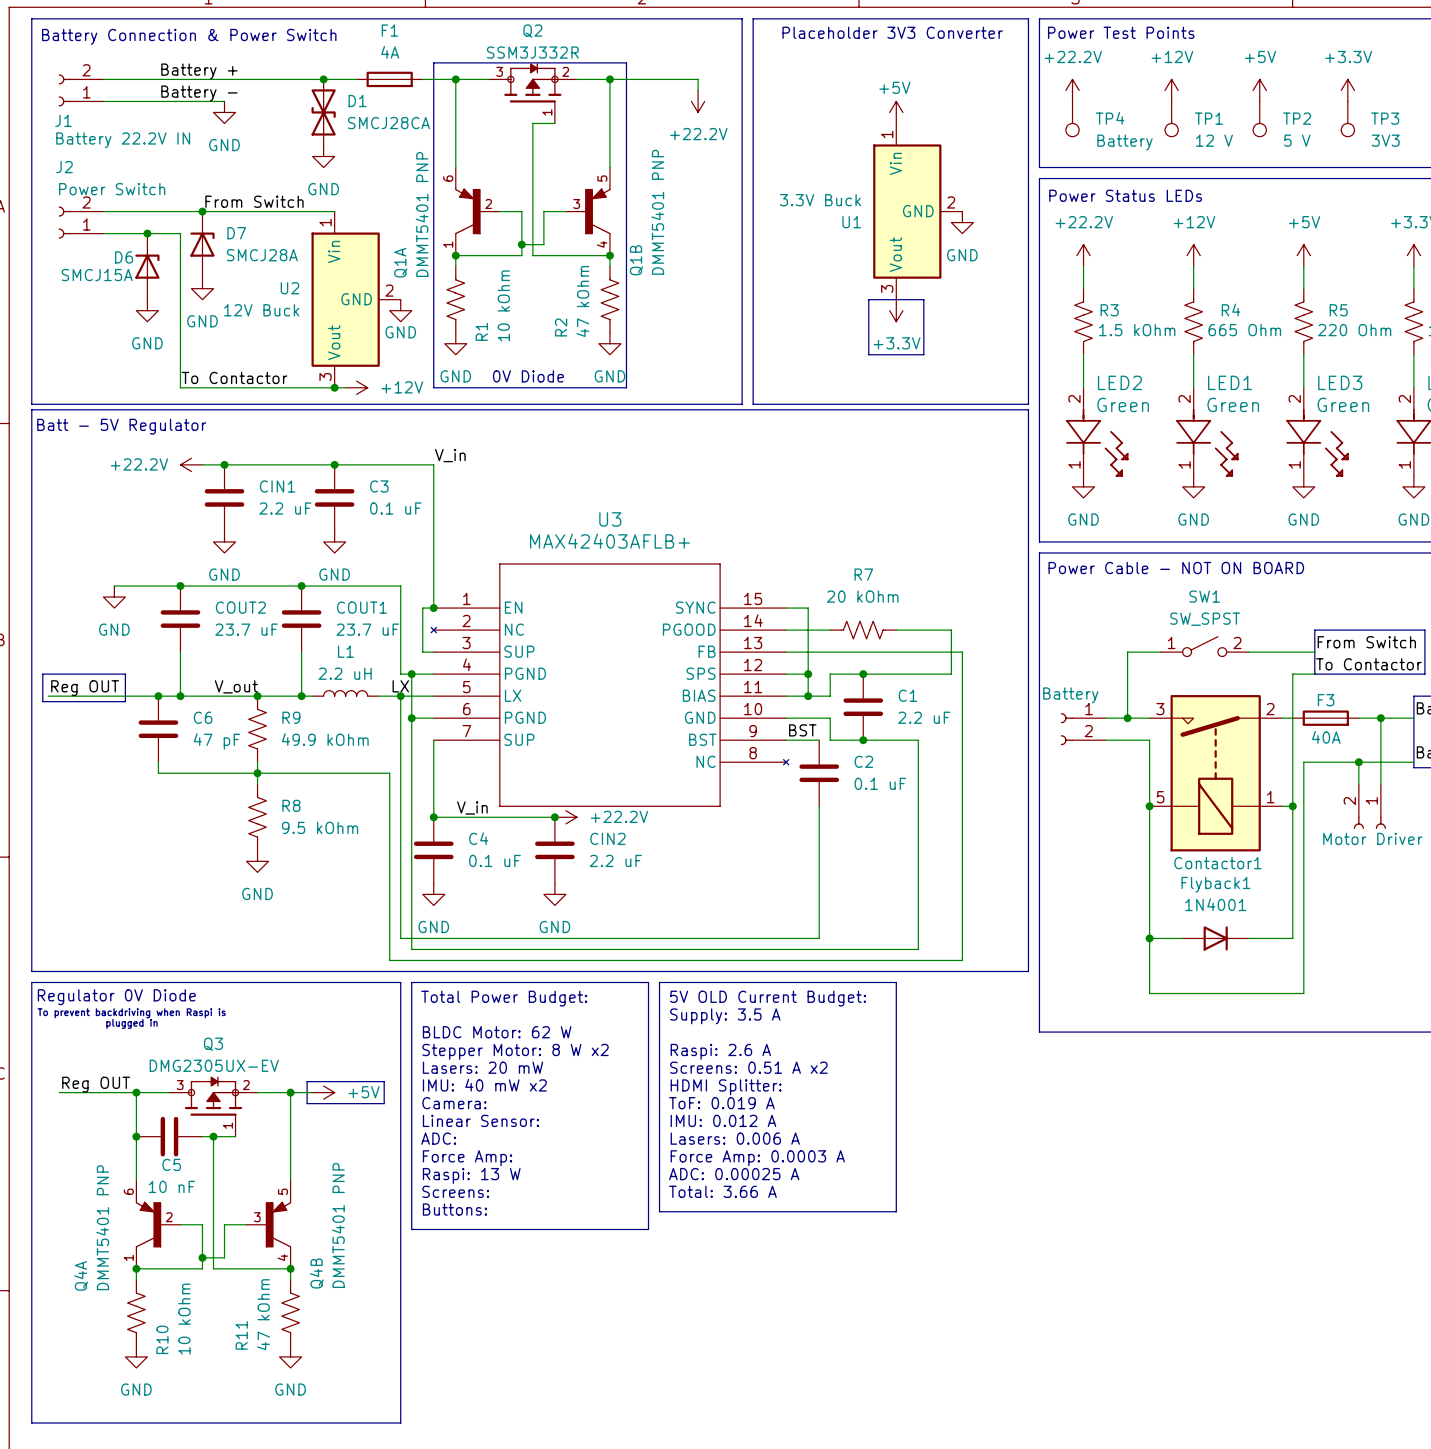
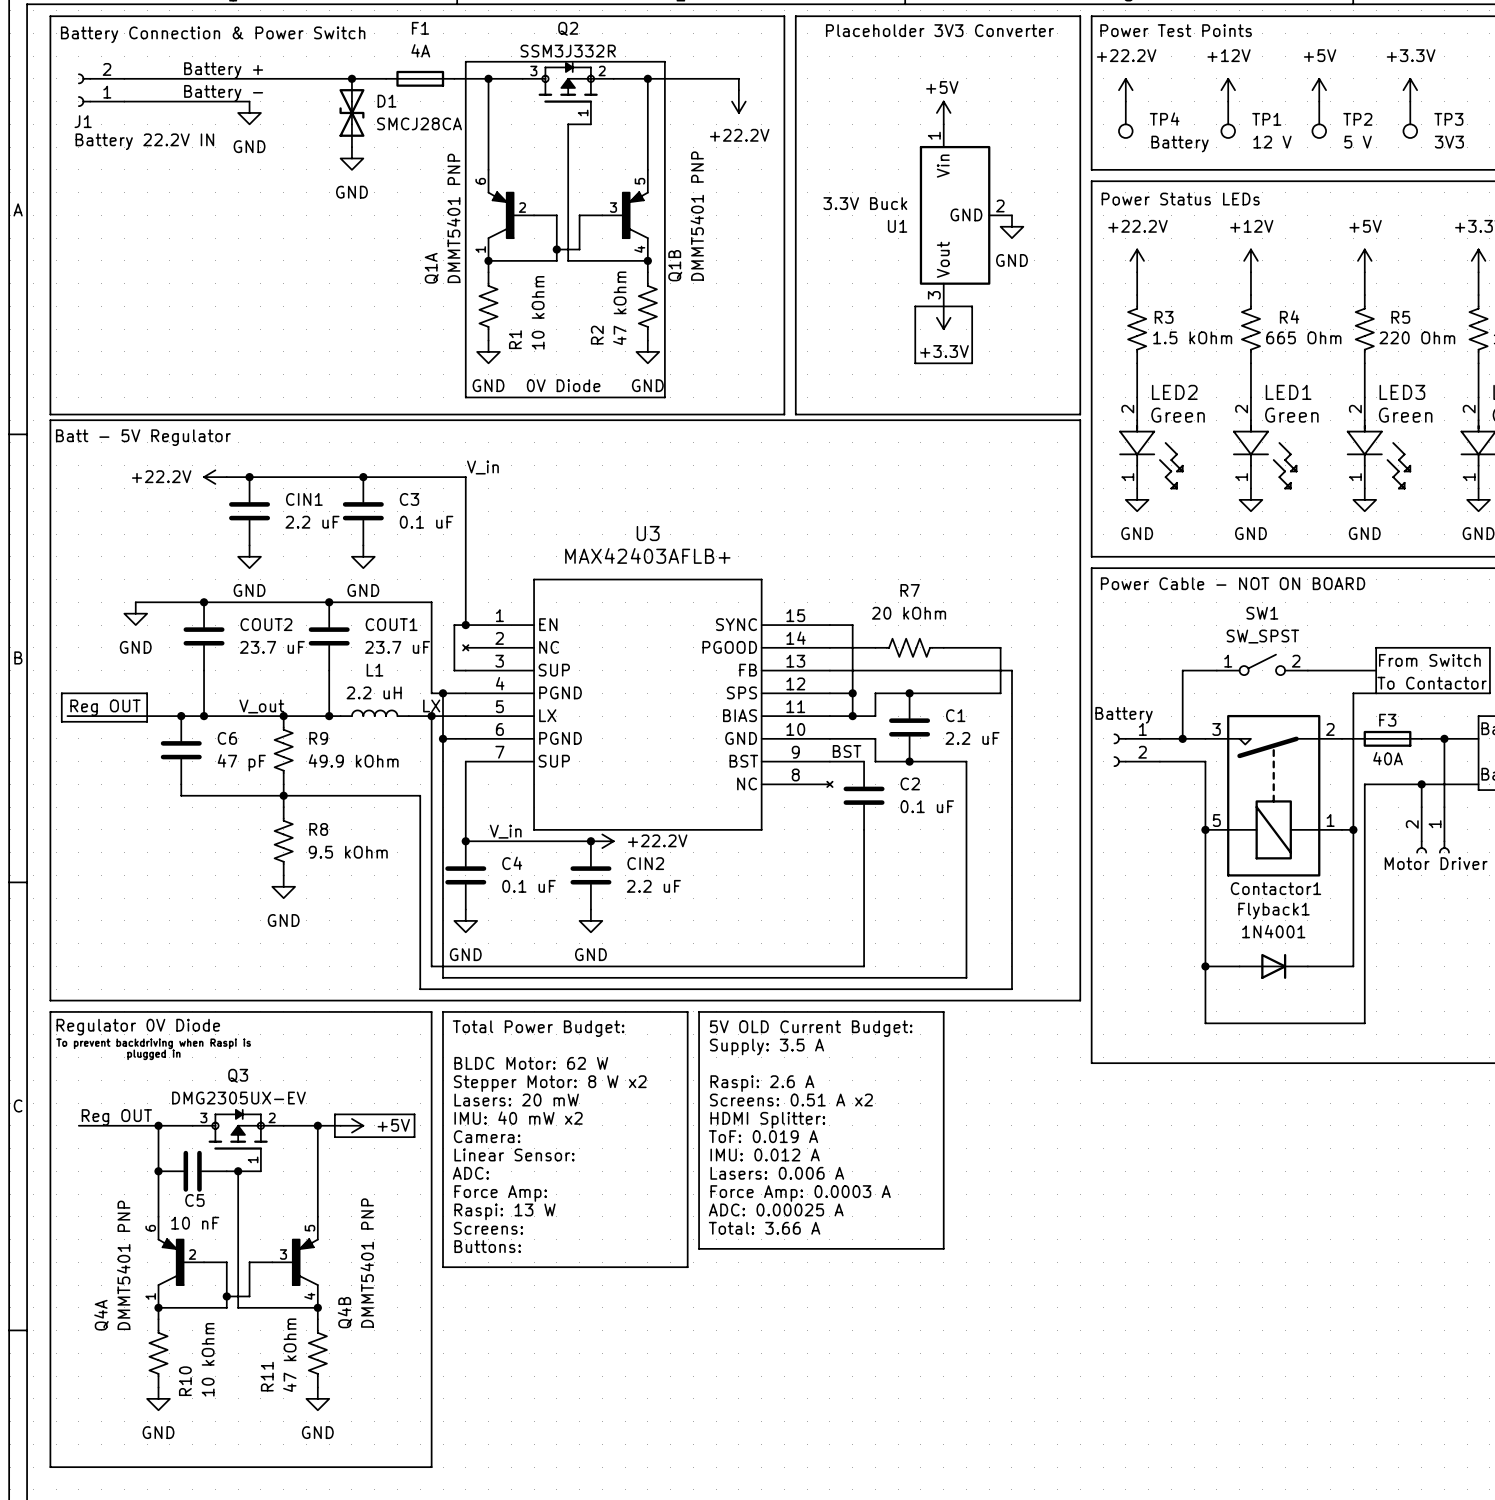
label: From Switch (254, 201) -> none
wire: (103, 211) (334, 211) -> none
junction: (202, 211) -> none
J2: Power Switch (81, 222) -> none
wire: (103, 233) (180, 233) (180, 387) (345, 387) -> none
junction: (147, 233) -> none
D7: SMCJ28A (202, 244) -> none
D6: SMCJ15A (147, 266) -> none
power symbol: GND (202, 288) -> none
U2: 12V Buck (356, 299) -> none
power symbol: GND (147, 310) -> none
power symbol: GND (400, 310) -> none
label: To Contactor (234, 377) -> none
junction: (334, 387) -> none
power symbol: +12V (356, 387) -> none

